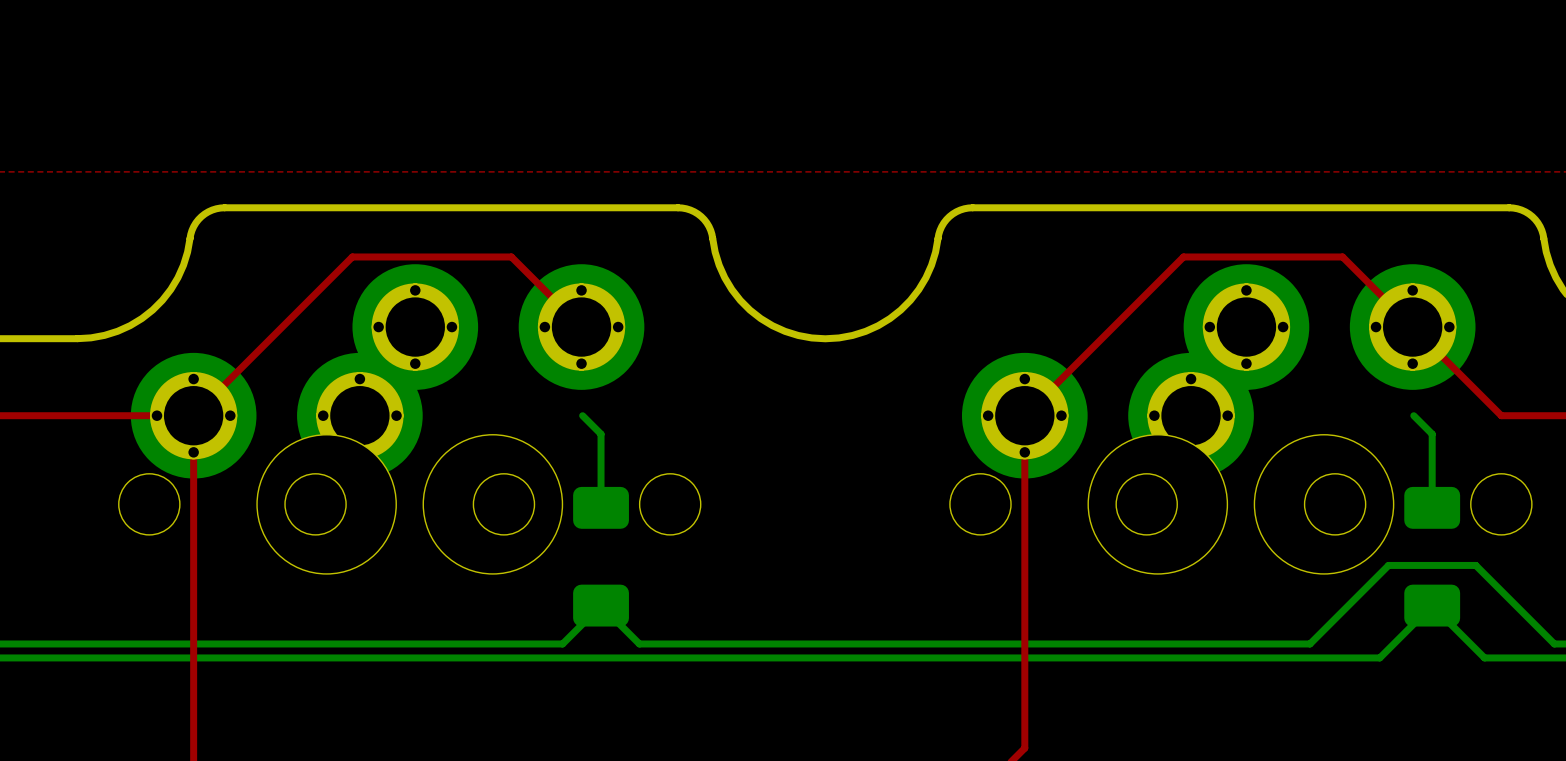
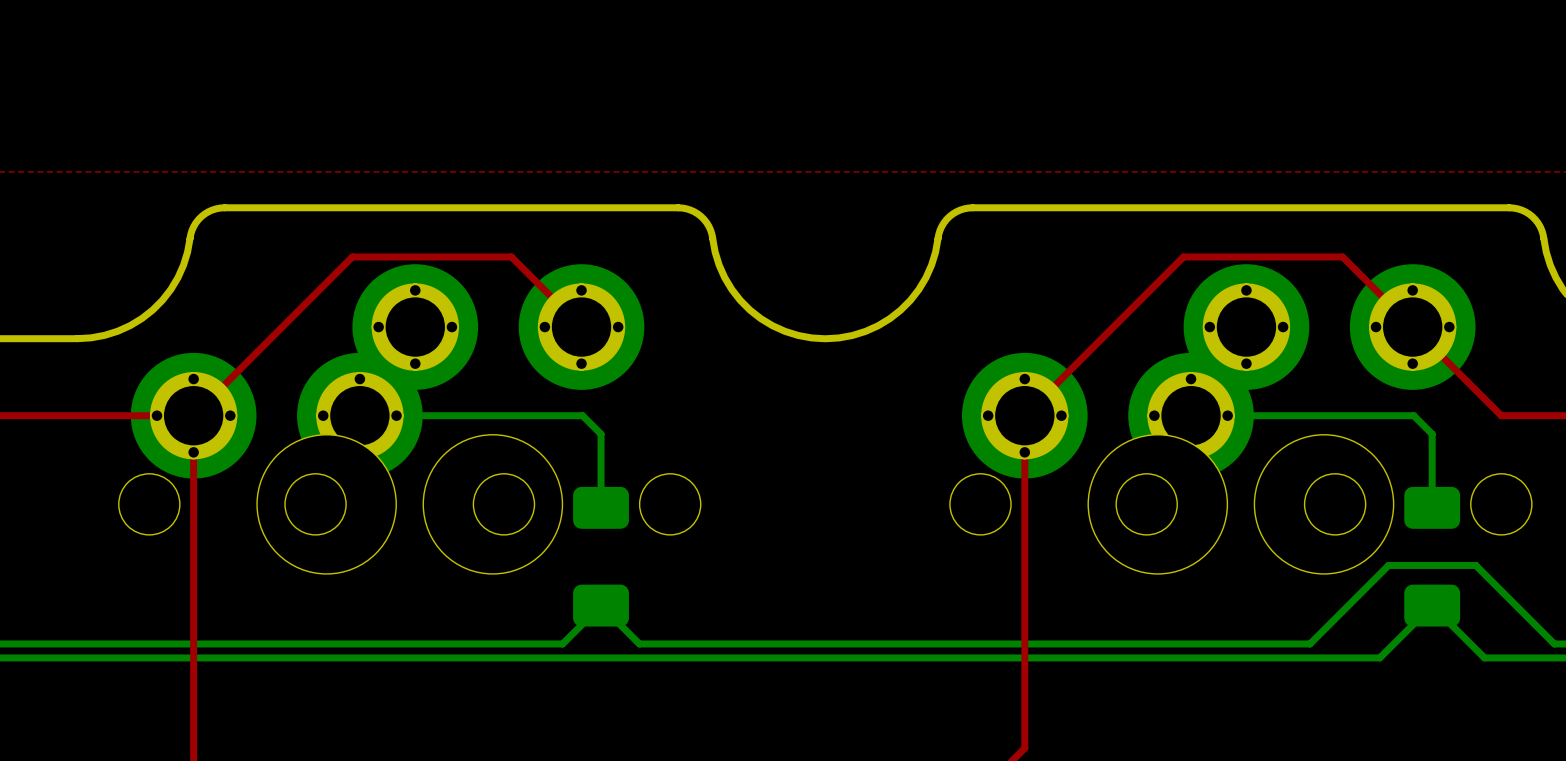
bottom track: none -> (359, 415) (582, 415)
bottom track: none -> (1191, 415) (1413, 415)

